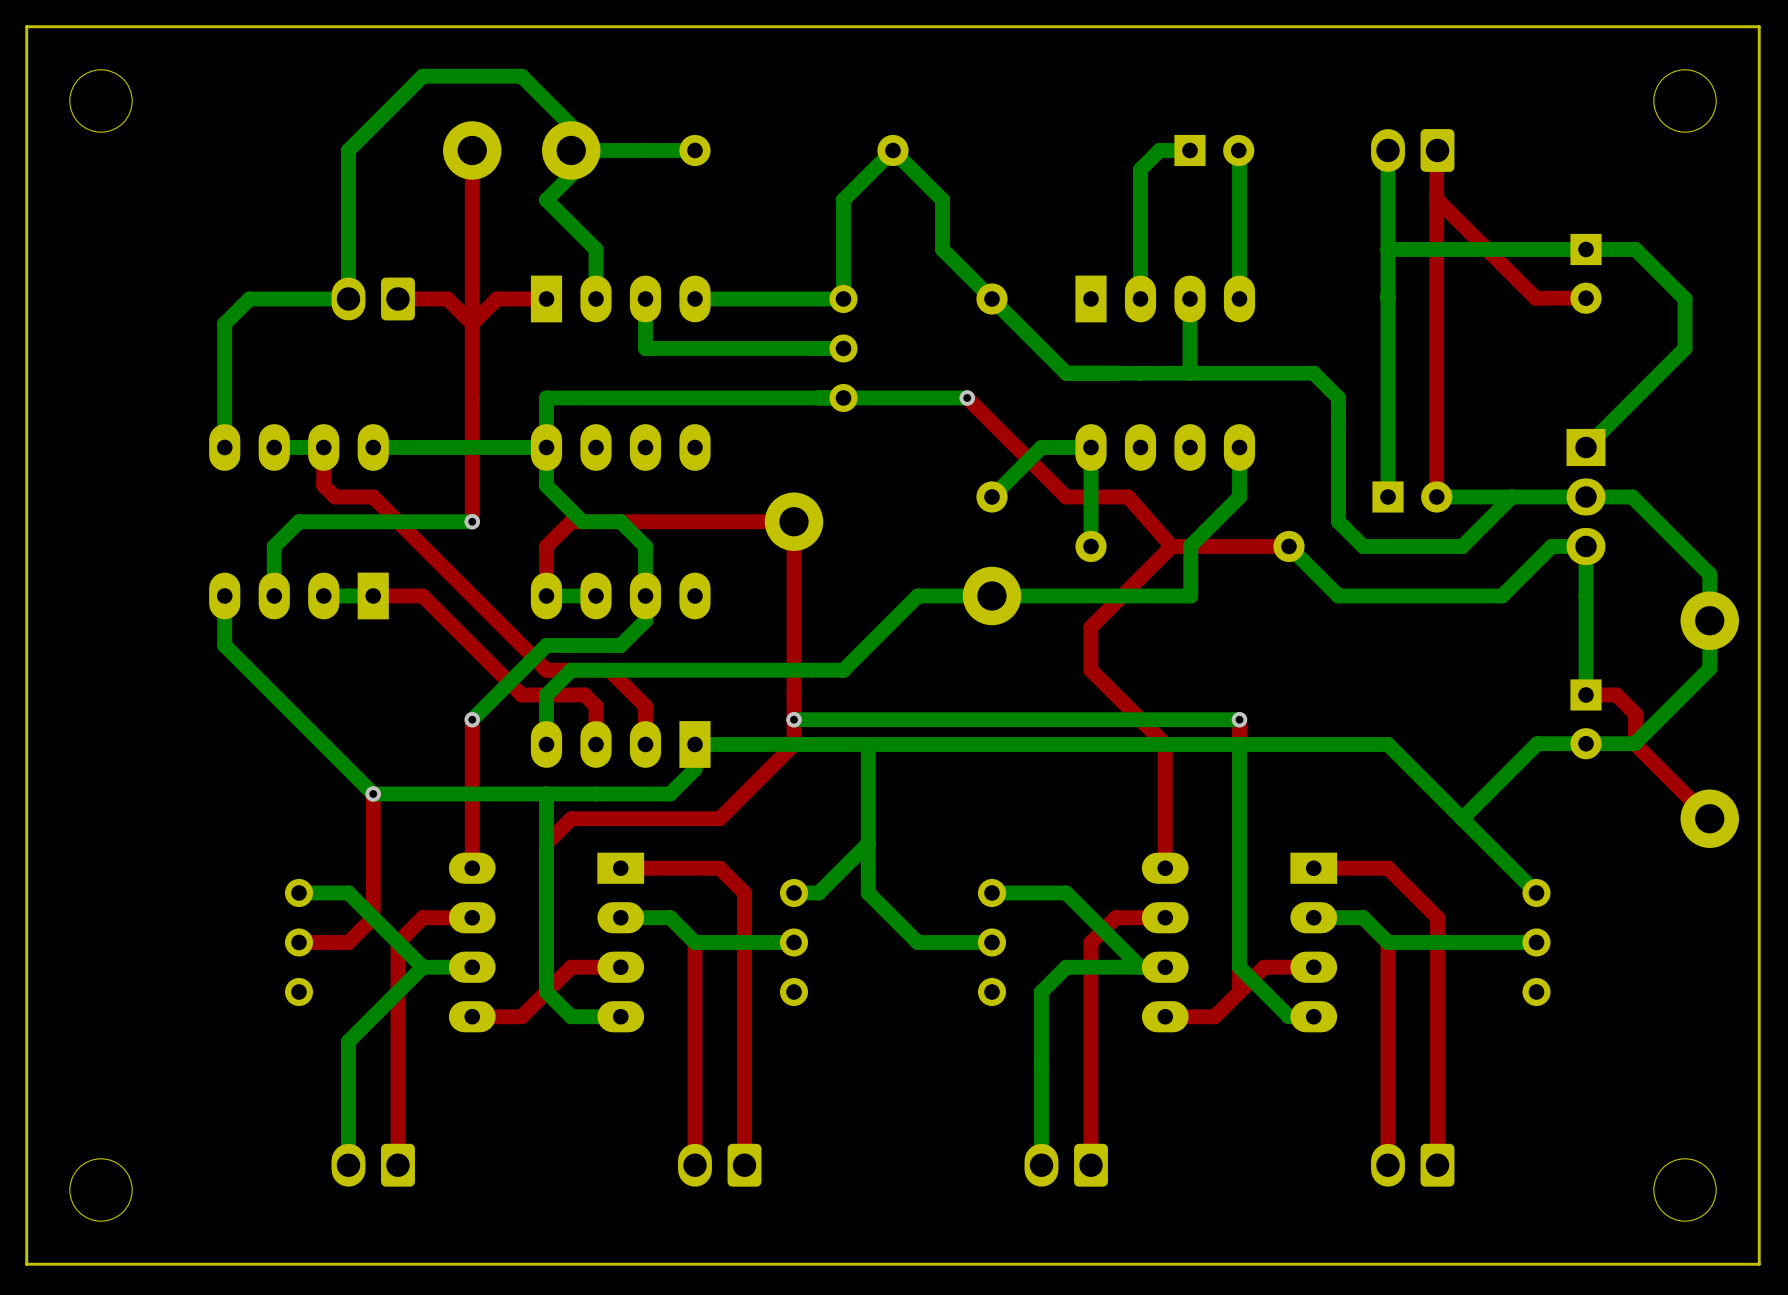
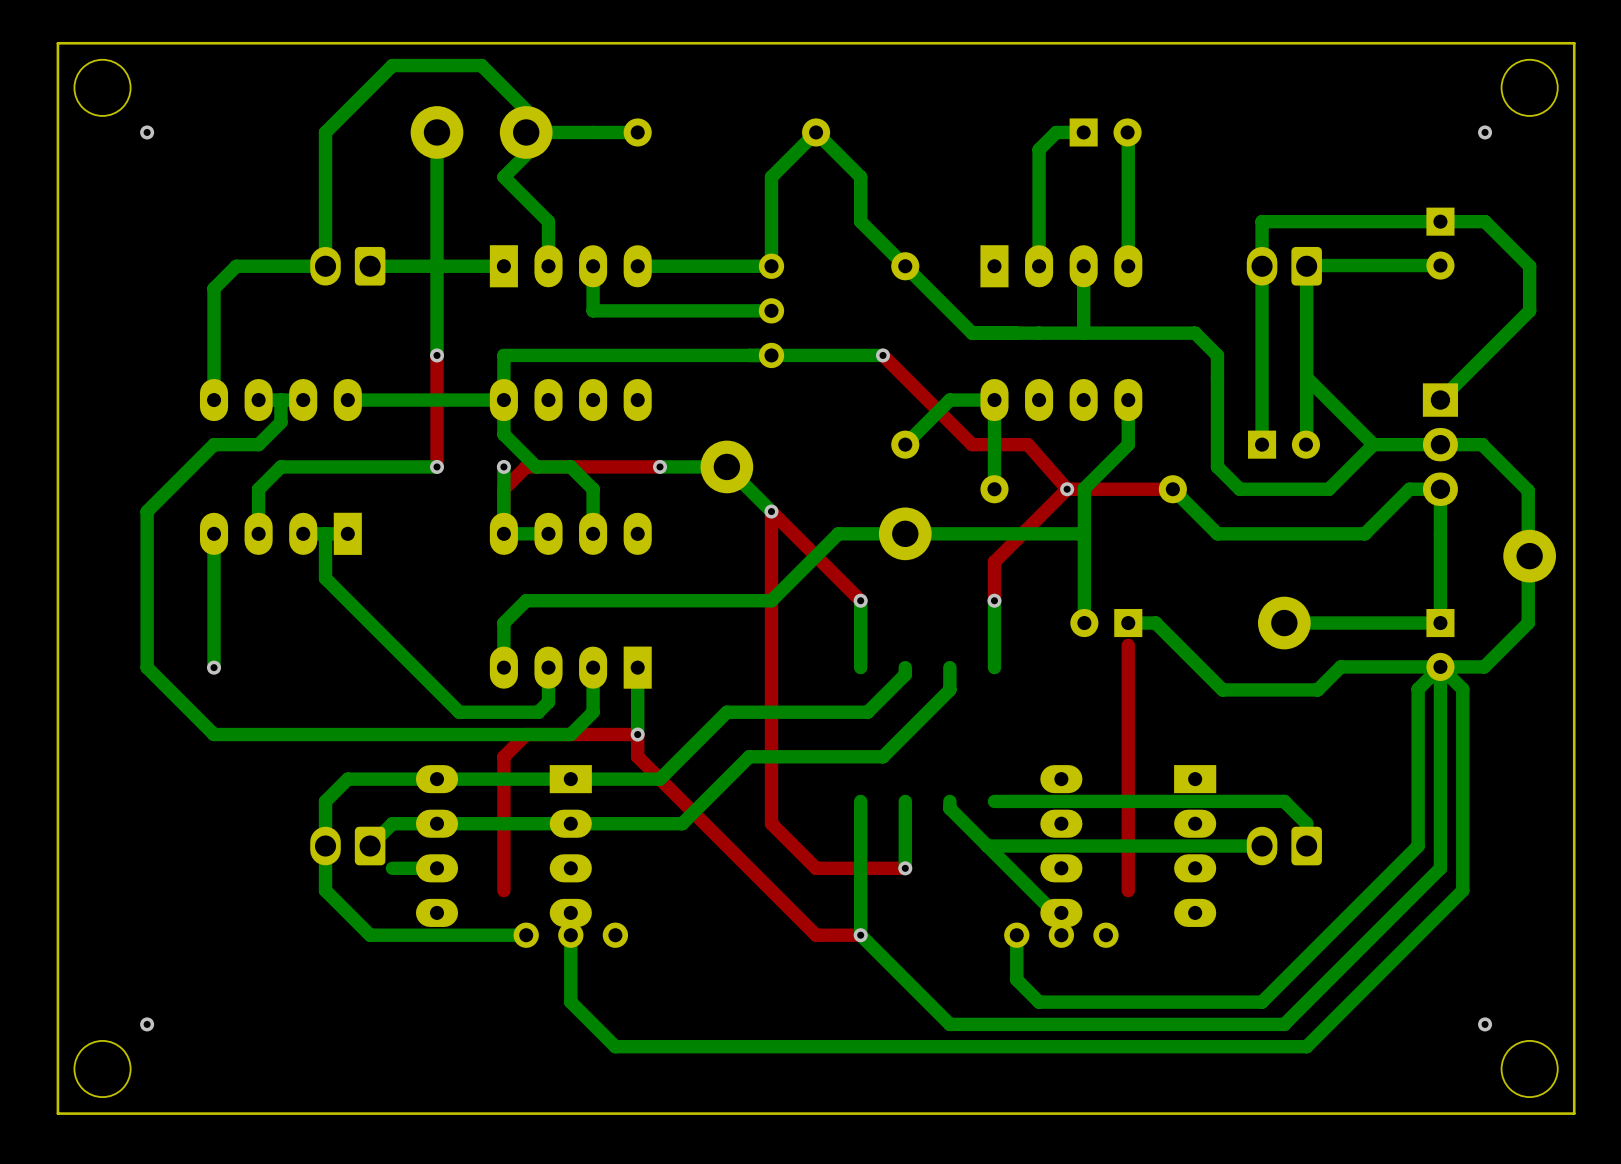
board edge: (1759, 26) (26, 26) (26, 1264) (1759, 1264) (1759, 26) -> (1574, 43) (1574, 1113) (57, 1113) (57, 43) (1574, 43)
via: none -> (147, 132)
bottom track: none -> (437, 132) (437, 355)
top track: (472, 150) (472, 397) -> none
bottom track: (1388, 150) (1388, 249) -> (1084, 533) (1084, 623)
part position: (1412, 150) -> (1284, 266)
top track: (1437, 150) (1436, 496) -> none
via: none -> (1485, 132)
top track: (1436, 199) (1535, 298) (1586, 298) -> none
bottom track: none -> (503, 266) (370, 266)
top track: (546, 298) (496, 298) (472, 323) (447, 298) (397, 298) -> none
bottom track: none -> (1440, 265) (1306, 266) (1306, 443)
via: none -> (437, 355)
bottom track: none -> (280, 400) (280, 422) (258, 444) (214, 444) (147, 511) (147, 667) (214, 734) (570, 734) (593, 712) (593, 667)
top track: (323, 447) (323, 485) (335, 496) (373, 496) (546, 670) (609, 670) (645, 706) (645, 744) -> none
bottom track: (1511, 496) (1436, 496) -> (1373, 444) (1306, 377)
bottom track: none -> (503, 466) (503, 533)
via: none -> (503, 466)
bottom track: none -> (659, 466) (726, 466) (771, 511)
top track: (719, 521) (793, 521) (793, 744) (719, 818) (694, 818) -> none
via: none -> (659, 466)
via: none -> (1067, 489)
bottom track: (1683, 548) (1709, 574) (1709, 668) (1683, 694) -> (1528, 490) (1528, 623)
via: none -> (771, 511)
top track: (373, 595) (422, 595) (521, 694) (584, 694) (595, 706) (595, 744) -> none
bottom track: (645, 595) (645, 620) (620, 645) (546, 645) (472, 719) -> none
part position: (1709, 620) -> (1529, 556)
bottom track: (224, 645) (373, 793) (496, 793) -> (325, 533) (325, 578) (459, 712)
bottom track: none -> (214, 578) (214, 667)
bottom track: none -> (860, 600) (860, 667)
top track: none -> (860, 600) (771, 511) (771, 823) (816, 868) (905, 868)
via: none -> (860, 600)
bottom track: none -> (994, 600) (994, 667)
top track: (1090, 670) (1165, 744) (1165, 868) -> none
via: none -> (994, 600)
part: none -> (1106, 623)
part: none -> (1284, 623)
bottom track: none -> (1440, 623) (1284, 623)
top track: (1586, 694) (1616, 694) (1635, 714) (1635, 744) (1709, 818) -> none
top track: (472, 719) (472, 868) -> none
via: (472, 719) -> none
via: (793, 719) -> none
bottom track: (1239, 719) (793, 719) -> none
via: (1239, 719) -> none
bottom track: (1537, 743) (1462, 818) -> (1396, 666) (1340, 666) (1317, 689) (1222, 689) (1155, 623) (1128, 623)
bottom track: none -> (1440, 666) (1440, 868) (1284, 1024) (949, 1024) (860, 935) (860, 801)
bottom track: none -> (1440, 666) (1418, 689) (1418, 846) (1262, 1002) (1039, 1002) (1016, 979) (1016, 935)
bottom track: none -> (1440, 666) (1462, 689) (1462, 890) (1306, 1046) (615, 1046) (570, 1002) (570, 935)
via: none -> (214, 667)
bottom track: (694, 744) (1388, 744) (1536, 892) -> none
bottom track: (868, 744) (868, 892) (917, 942) (991, 942) -> none
bottom track: none -> (905, 667) (905, 674) (867, 712) (726, 712) (659, 779) (347, 779) (325, 801) (325, 890) (370, 935) (526, 935)
bottom track: (1239, 744) (1239, 967) (1289, 1016) (1313, 1016) -> none
bottom track: (694, 769) (670, 793) (584, 793) -> (548, 667) (548, 702) (538, 712)
bottom track: none -> (637, 689) (637, 734)
top track: (373, 793) (373, 917) (348, 942) (298, 942) -> none
via: (373, 793) -> none
bottom track: (546, 793) (546, 991) (571, 1016) (620, 1016) -> none
via: none -> (637, 734)
part: (1709, 818) -> none
bottom track: (868, 843) (818, 892) (793, 892) -> none
top track: (719, 868) (620, 868) -> (659, 779) (637, 756) (637, 734)
top track: (1313, 868) (1388, 868) (1437, 917) (1437, 1165) -> none
bottom track: (298, 892) (348, 892) (422, 967) (348, 1041) (348, 1165) -> none
top track: (744, 892) (744, 1165) -> (682, 801) (816, 935) (860, 935)
bottom track: (991, 892) (1066, 892) (1140, 967) -> (905, 801) (905, 868)
bottom track: none -> (949, 801) (949, 808) (1061, 919)
bottom track: none -> (994, 801) (1284, 801) (1306, 823) (1306, 846)
top track: (472, 917) (422, 917) (397, 942) (397, 1165) -> none
bottom track: none -> (570, 823) (392, 823) (370, 846)
top track: (620, 917) (670, 917) (694, 942) (694, 1165) -> none
bottom track: (670, 917) (694, 942) (793, 942) -> (615, 823) (682, 823) (749, 756) (882, 756) (949, 689) (949, 667)
top track: (1165, 917) (1115, 917) (1090, 942) (1090, 1165) -> none
bottom track: (1313, 917) (1363, 917) (1388, 942) (1536, 942) -> none
top track: (1313, 917) (1363, 917) (1388, 942) (1388, 1165) -> none
part: (298, 942) -> none
part: none -> (347, 846)
part: (793, 942) -> none
part: (991, 942) -> none
bottom track: none -> (1262, 846) (987, 846)
part: none -> (1284, 846)
part: (1536, 942) -> none
top track: (620, 967) (571, 967) (521, 1016) (472, 1016) -> none
via: none -> (905, 868)
bottom track: (1165, 967) (1066, 967) (1041, 991) (1041, 1165) -> none
top track: (1313, 967) (1264, 967) (1214, 1016) (1165, 1016) -> none
part: none -> (570, 935)
via: none -> (860, 935)
part: none -> (1061, 935)
via: none -> (147, 1024)
via: none -> (1485, 1024)
part: (373, 1165) -> none
part: (719, 1165) -> none
part: (1066, 1165) -> none
part: (1412, 1165) -> none

